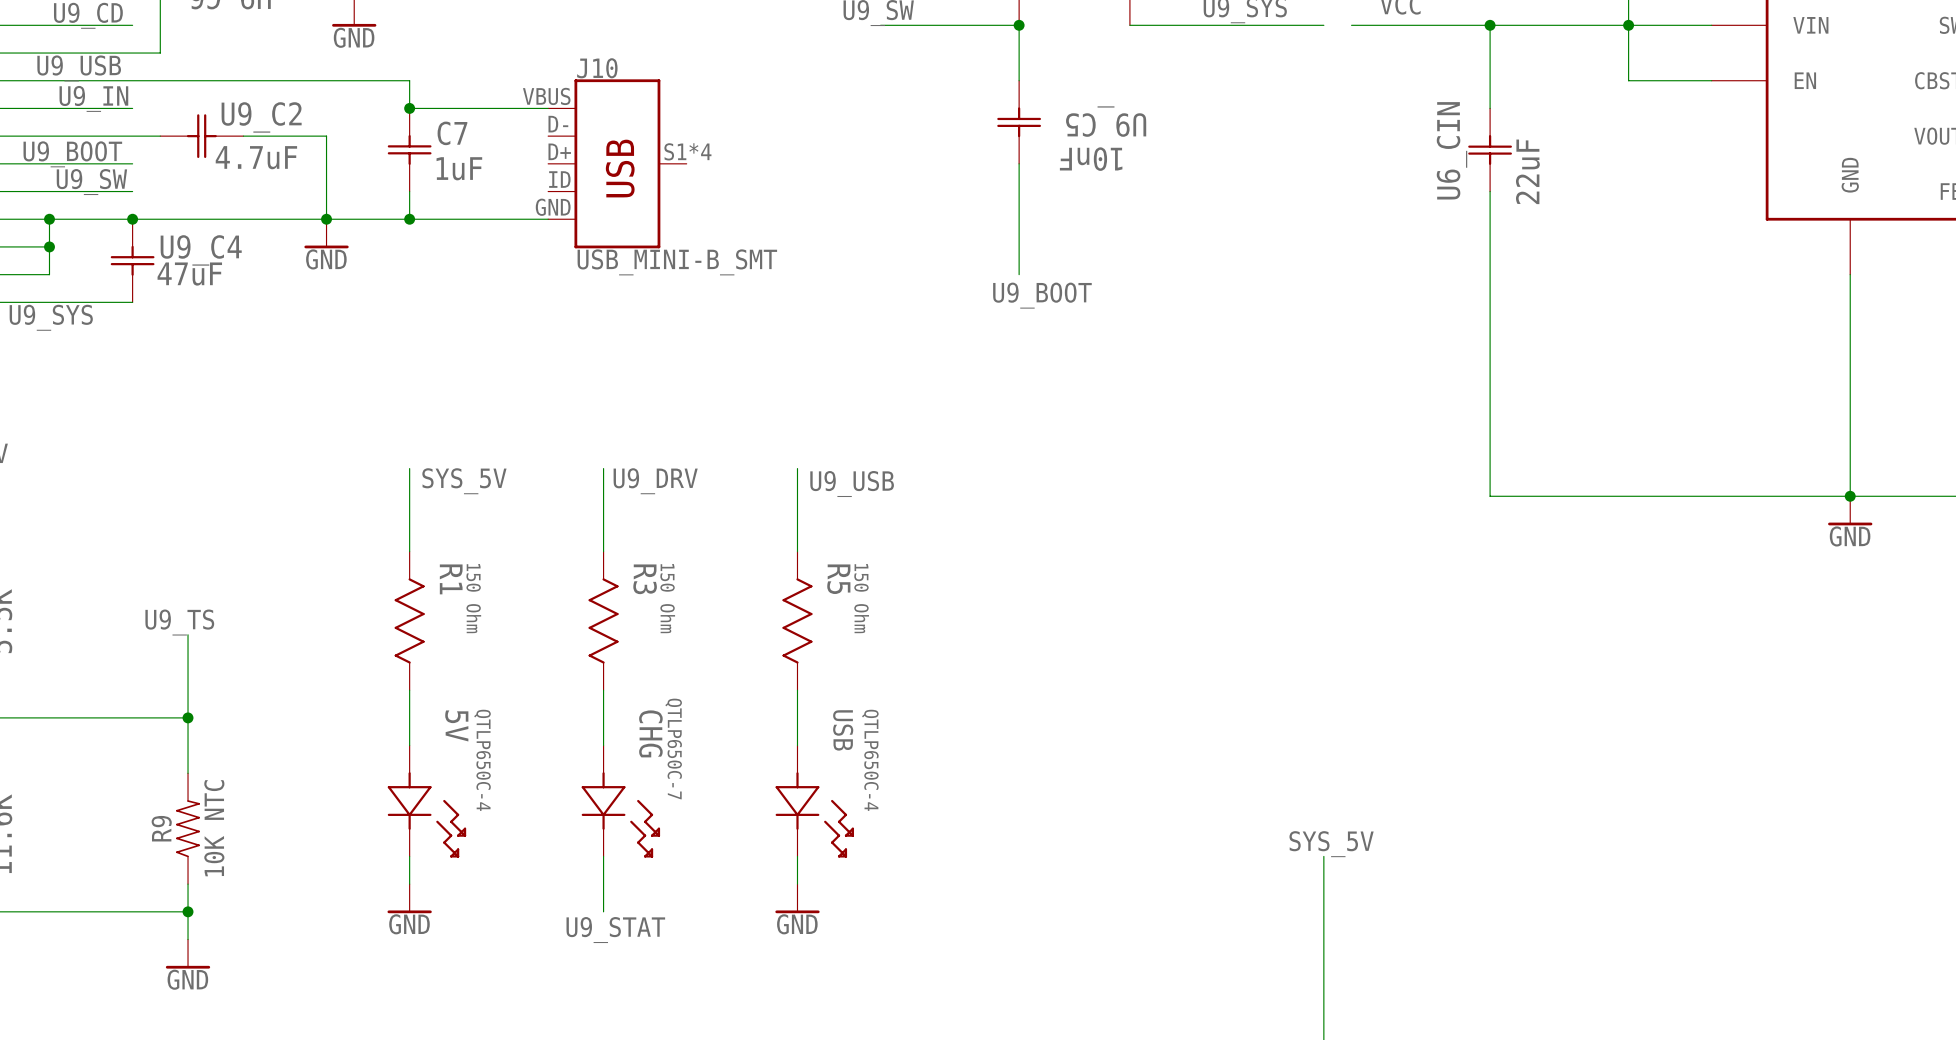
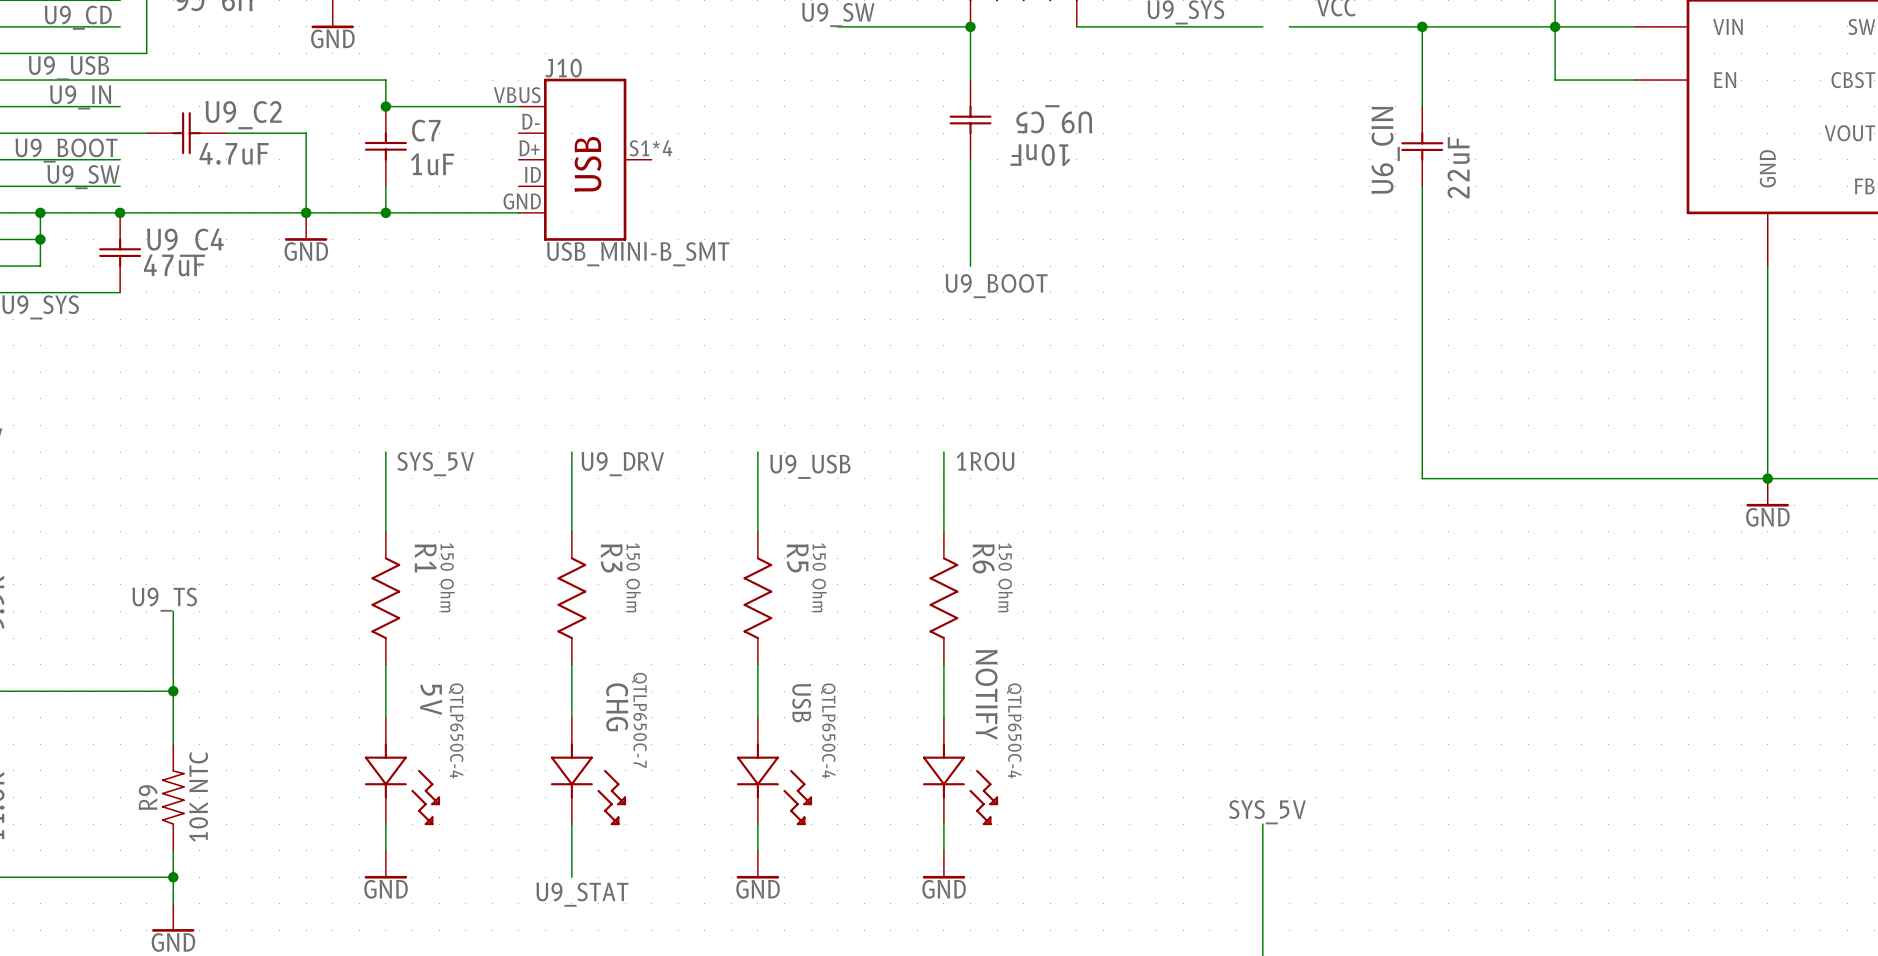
wire: none -> (943, 452) (943, 531)
label: none -> 1ROU (985, 461)
R6: none -> 150 Ohm (943, 598)
wire: none -> (943, 664) (943, 717)
NOTIFY: none -> QTLP650C-4 (960, 771)
wire: none -> (943, 824) (943, 850)
power symbol: none -> GND (943, 864)

